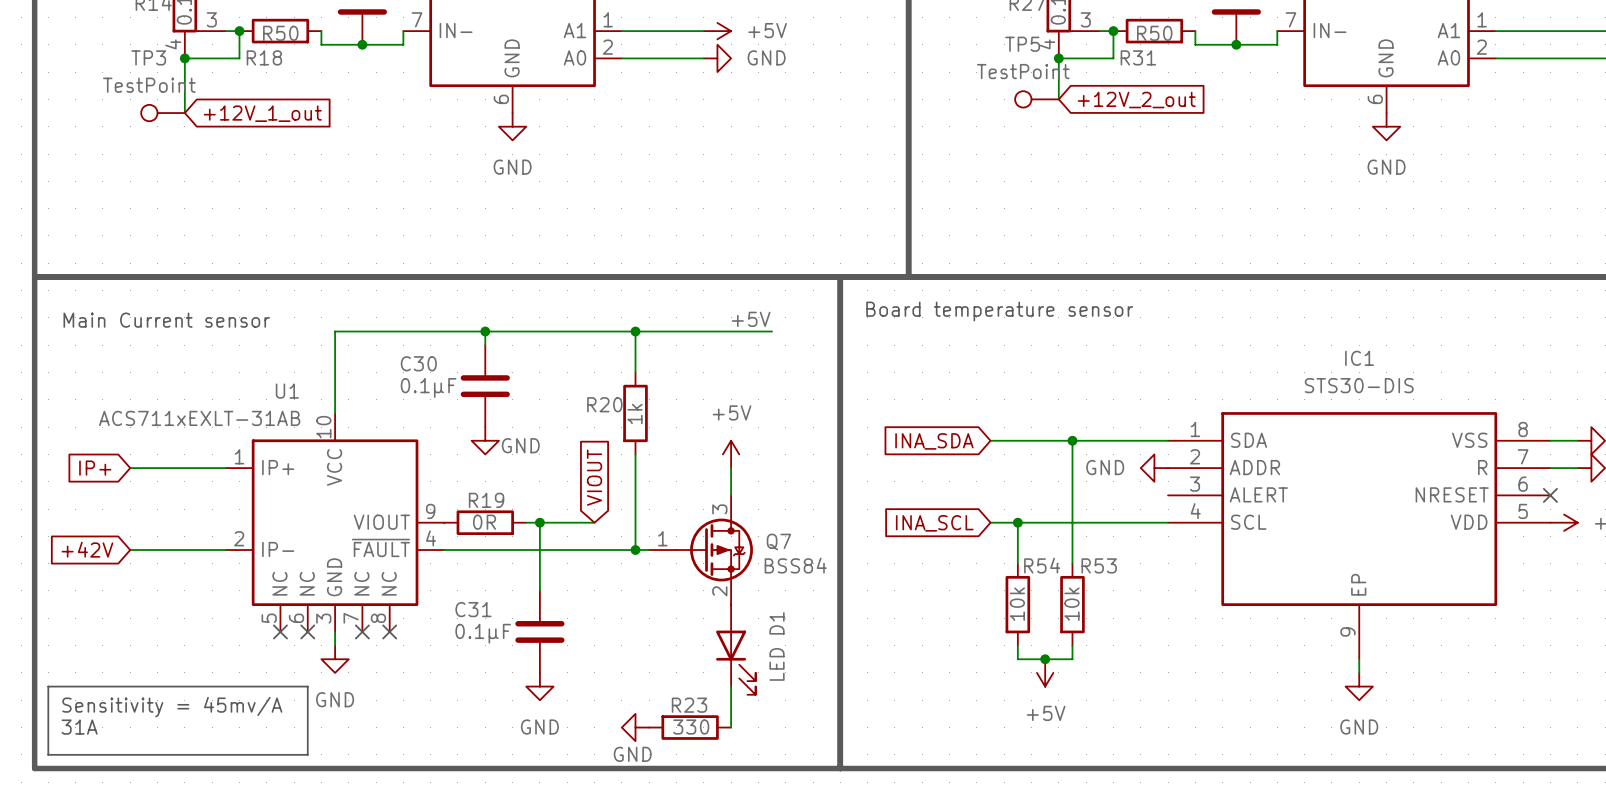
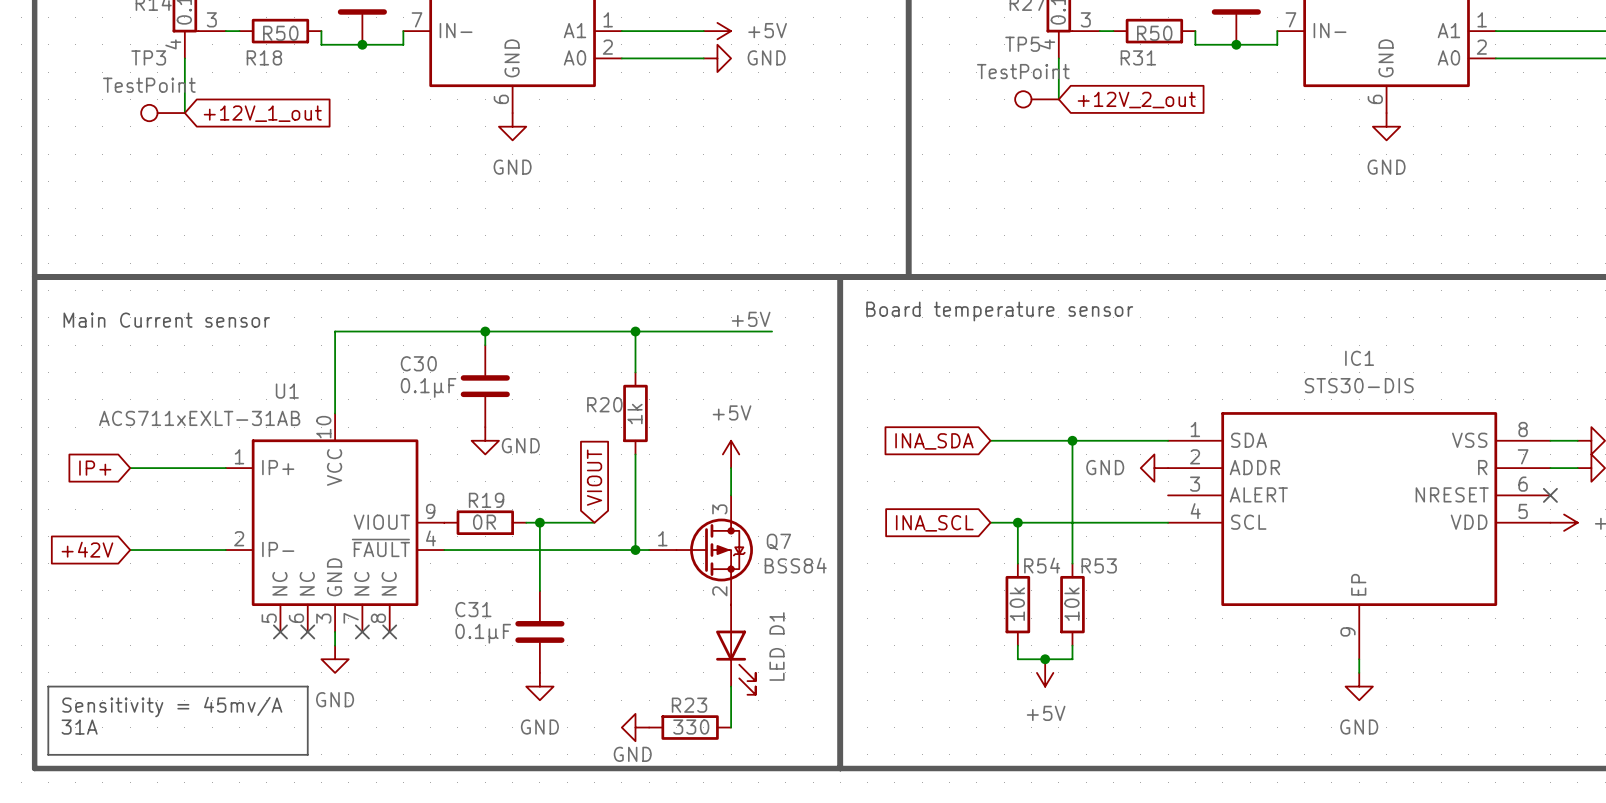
wire: (239, 31) (239, 58) (184, 58) -> none
junction: (239, 31) -> none
wire: (1113, 31) (1113, 58) (1058, 58) -> none
junction: (1113, 31) -> none
junction: (184, 58) -> none
junction: (1058, 58) -> none

